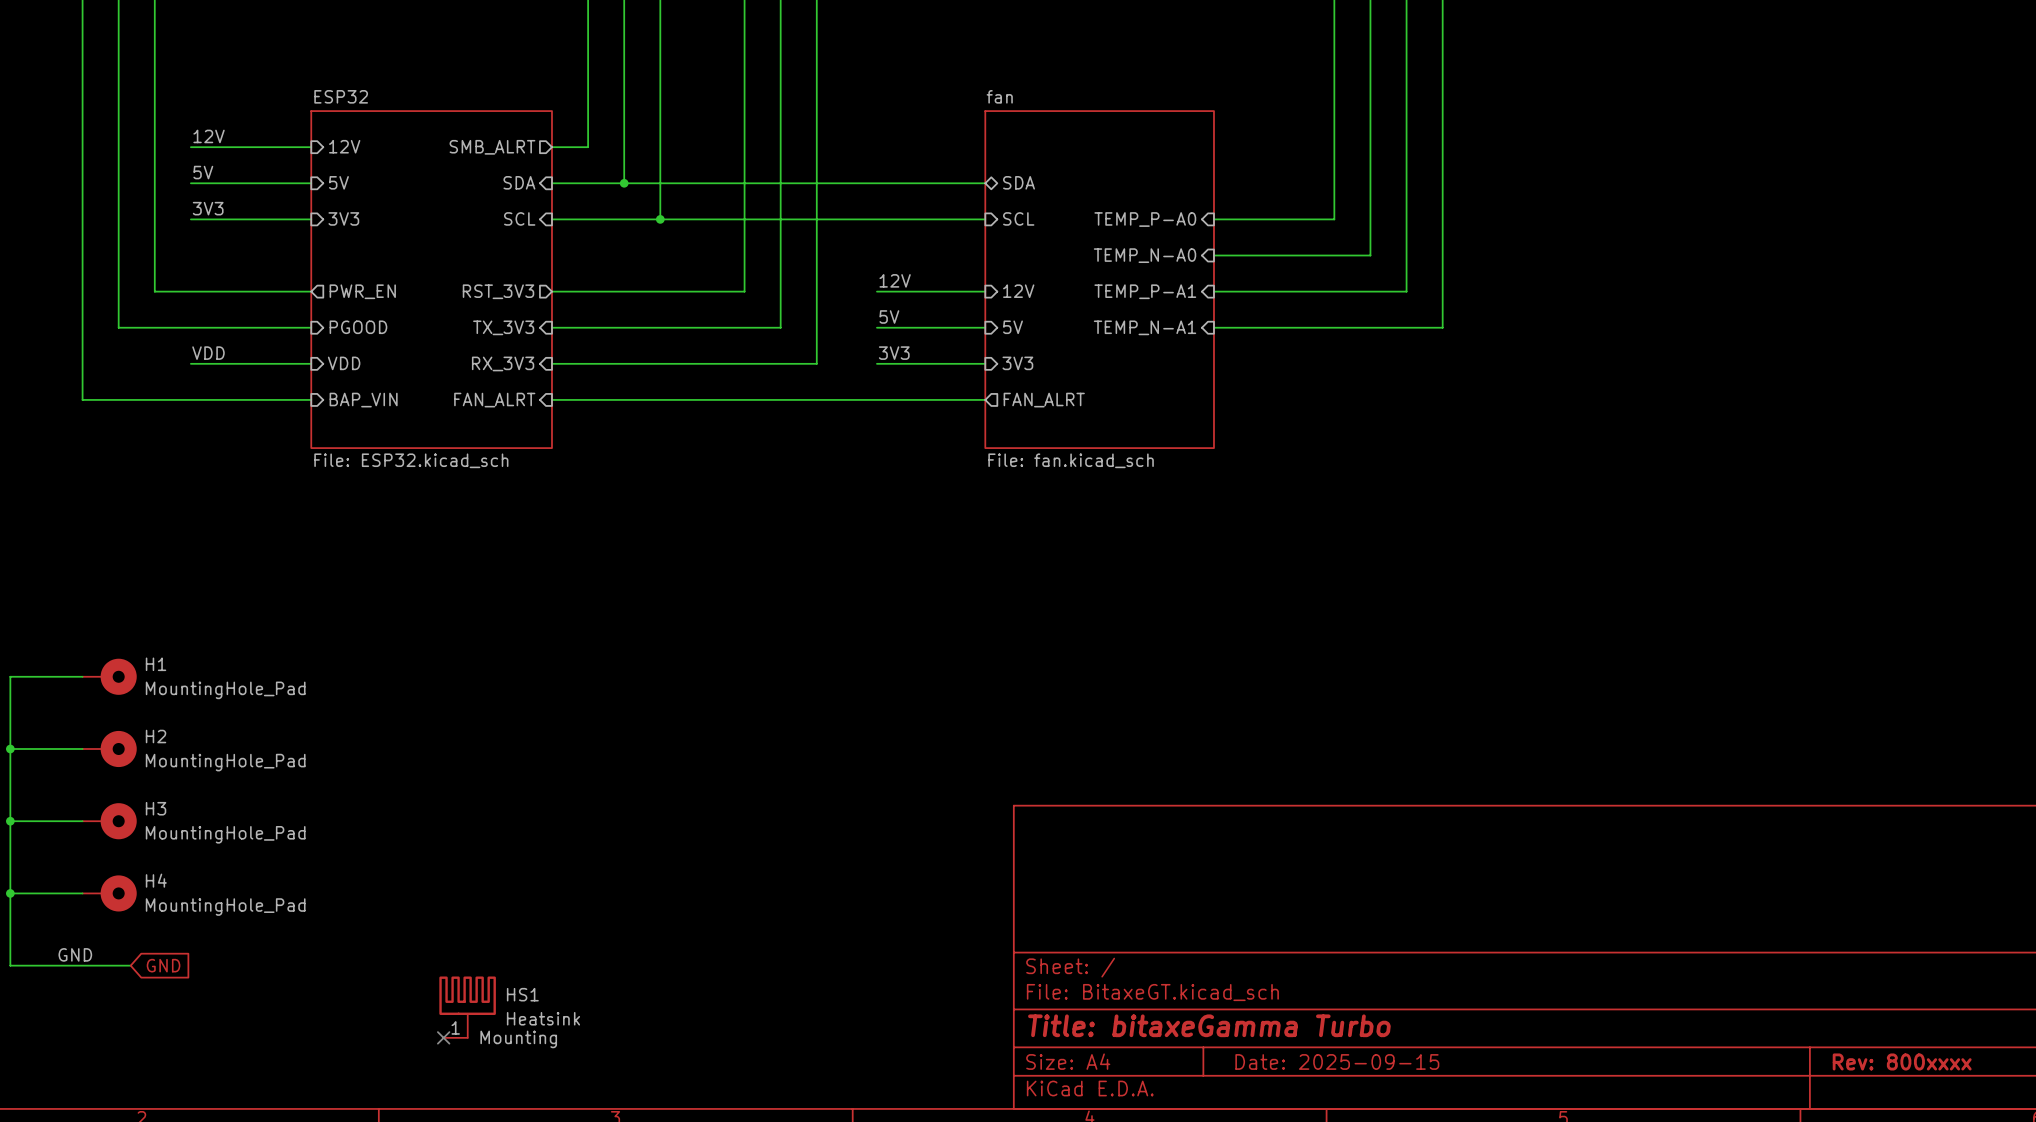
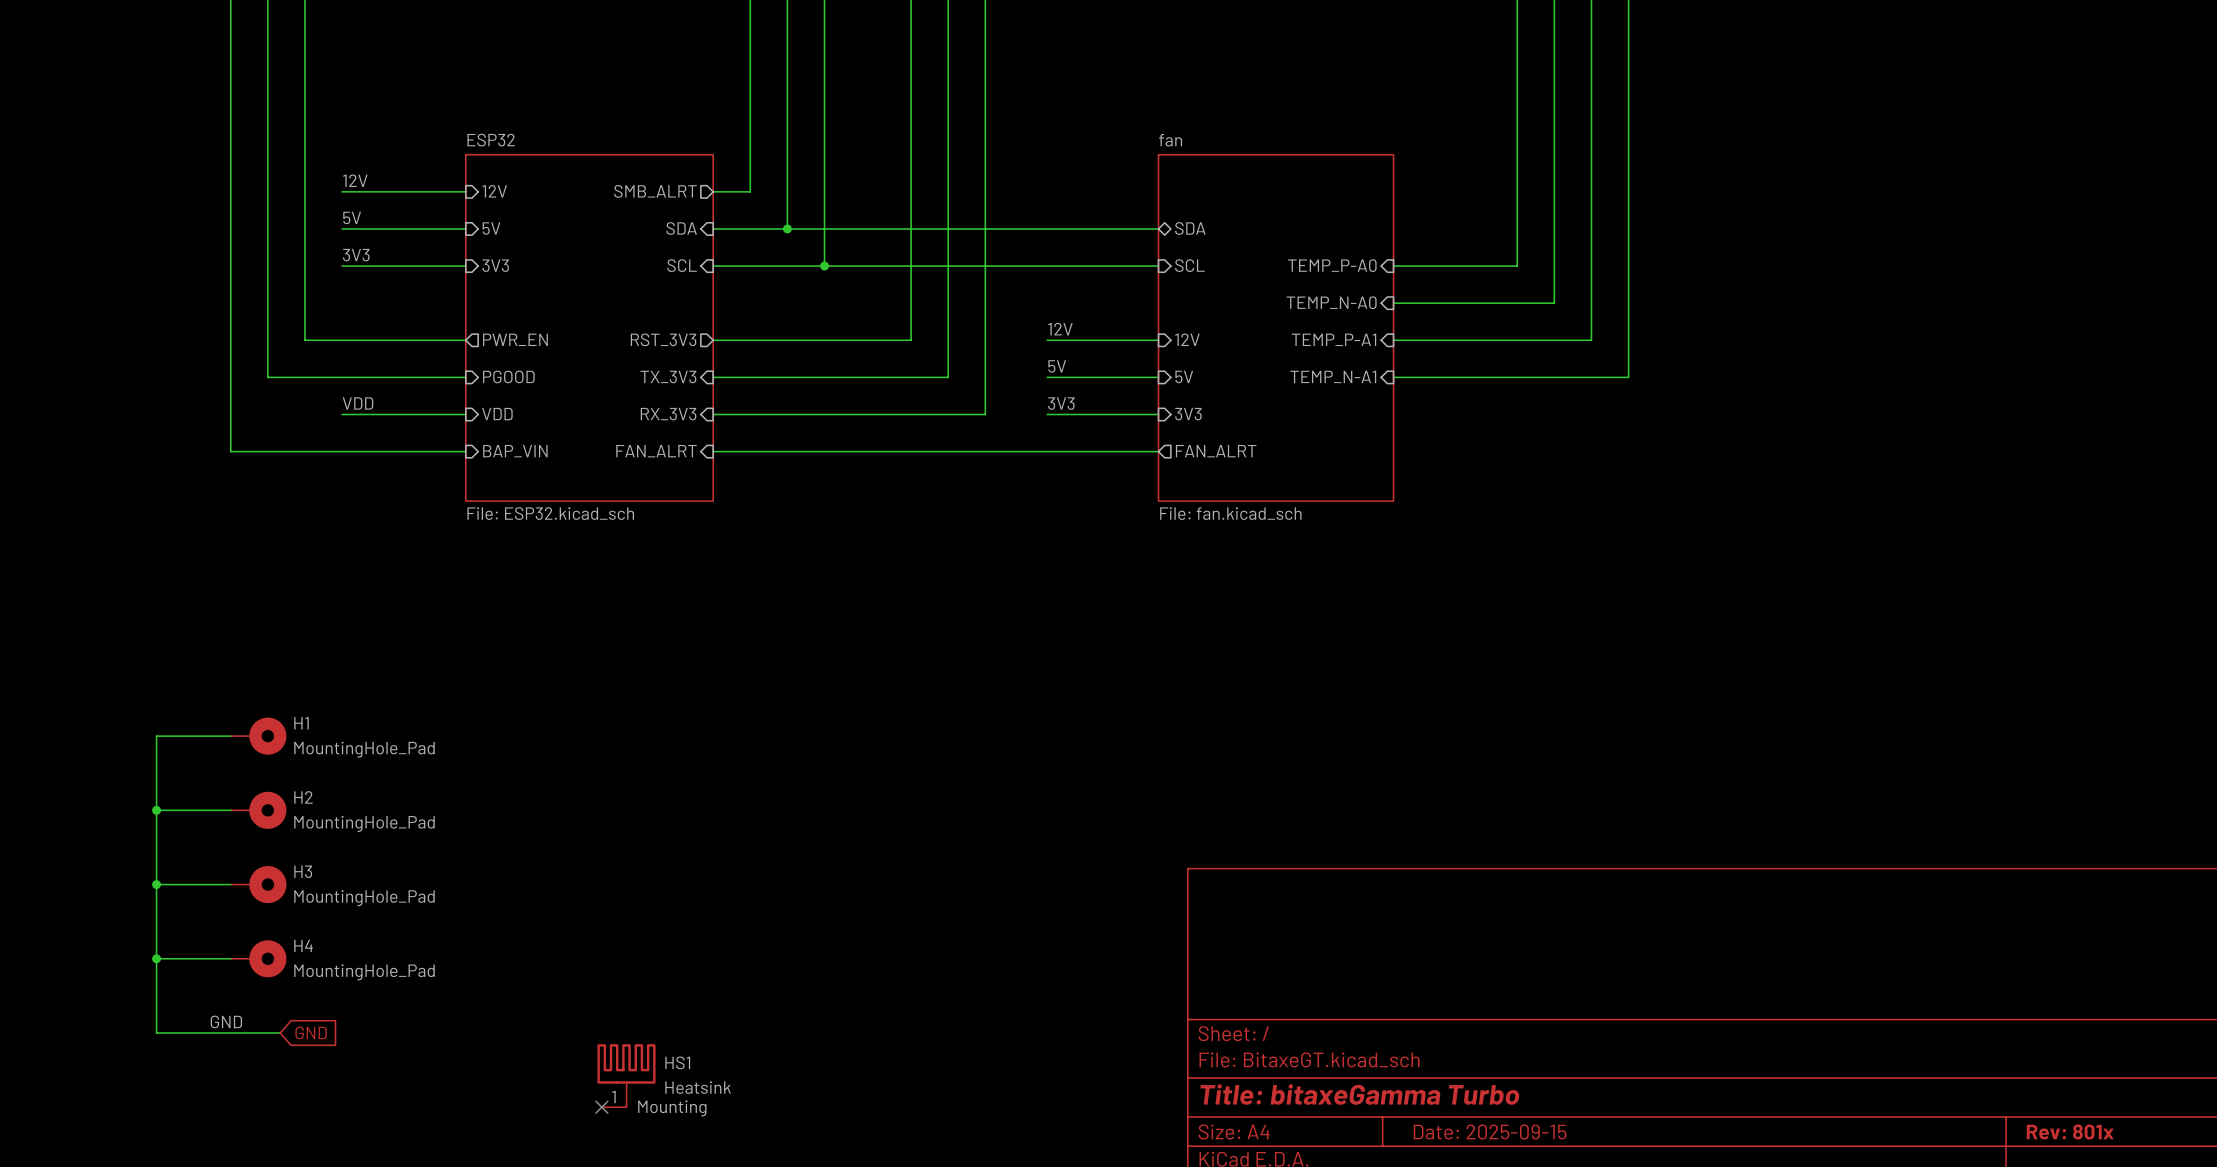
title block: Rev: 800xxxx (1902, 1061) -> Rev: 801x (2070, 1131)

